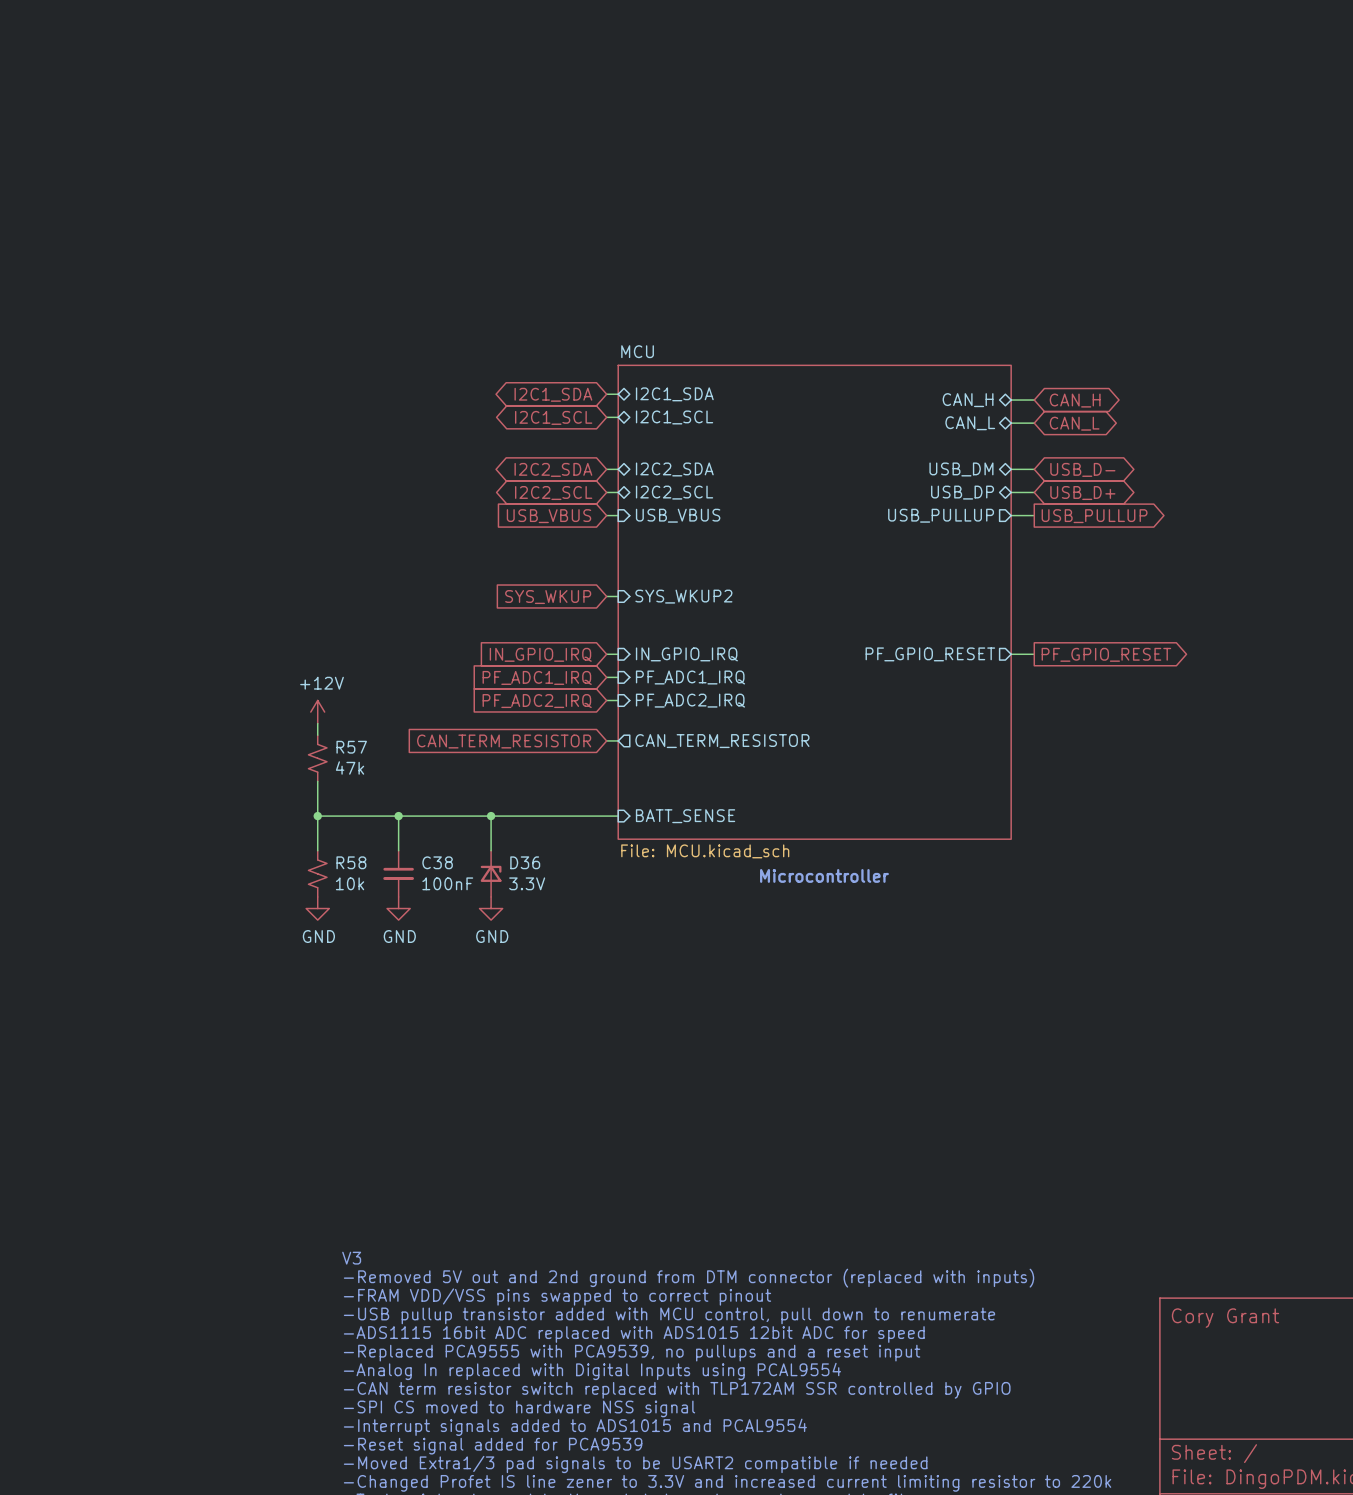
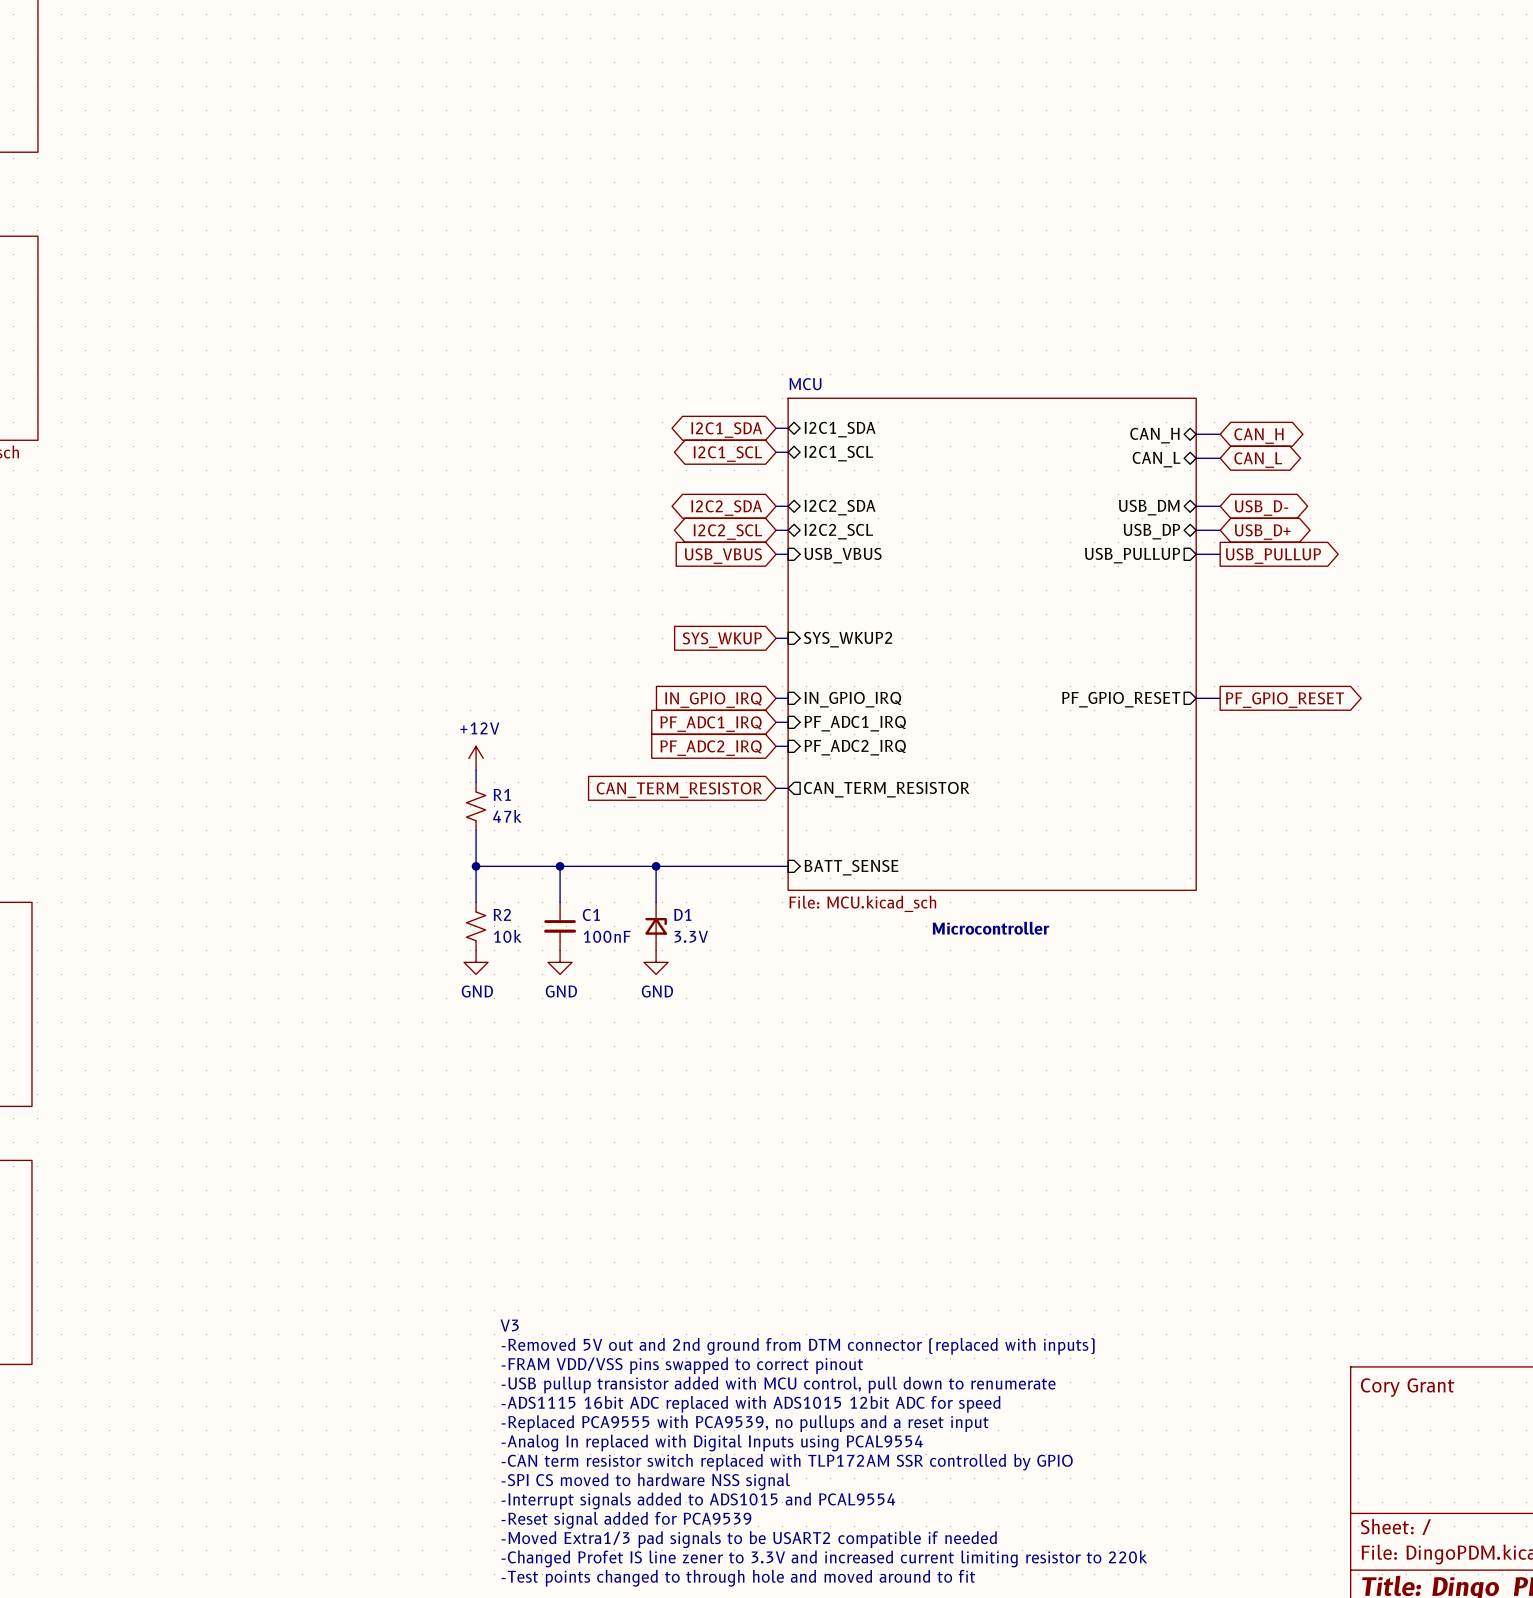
R57 name: R57 (351, 747) -> R1 (502, 794)
R58 name: R58 (351, 862) -> R2 (502, 914)
C38 name: C38 (437, 862) -> C1 (591, 914)
D36 name: D36 (525, 862) -> D1 (682, 914)

